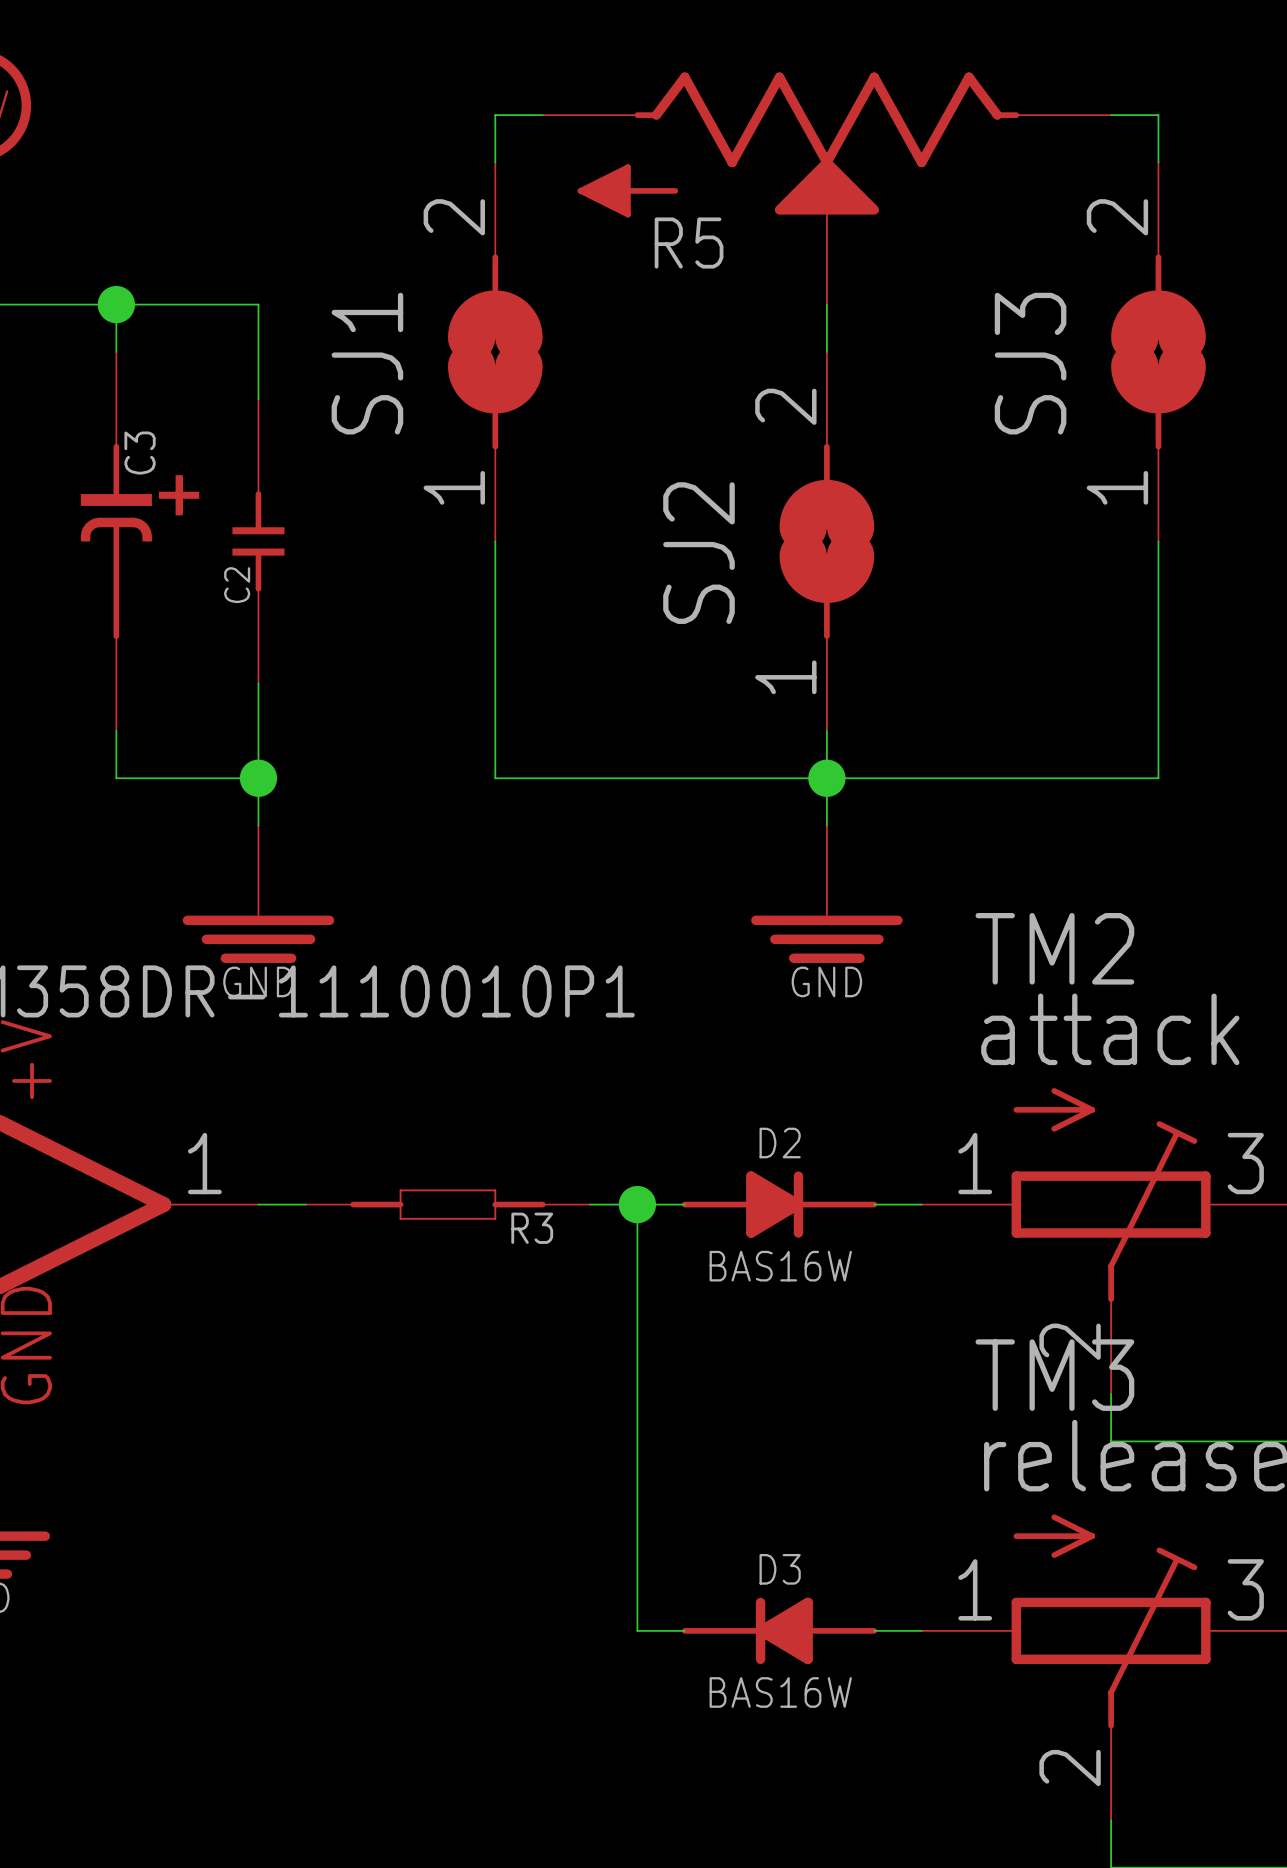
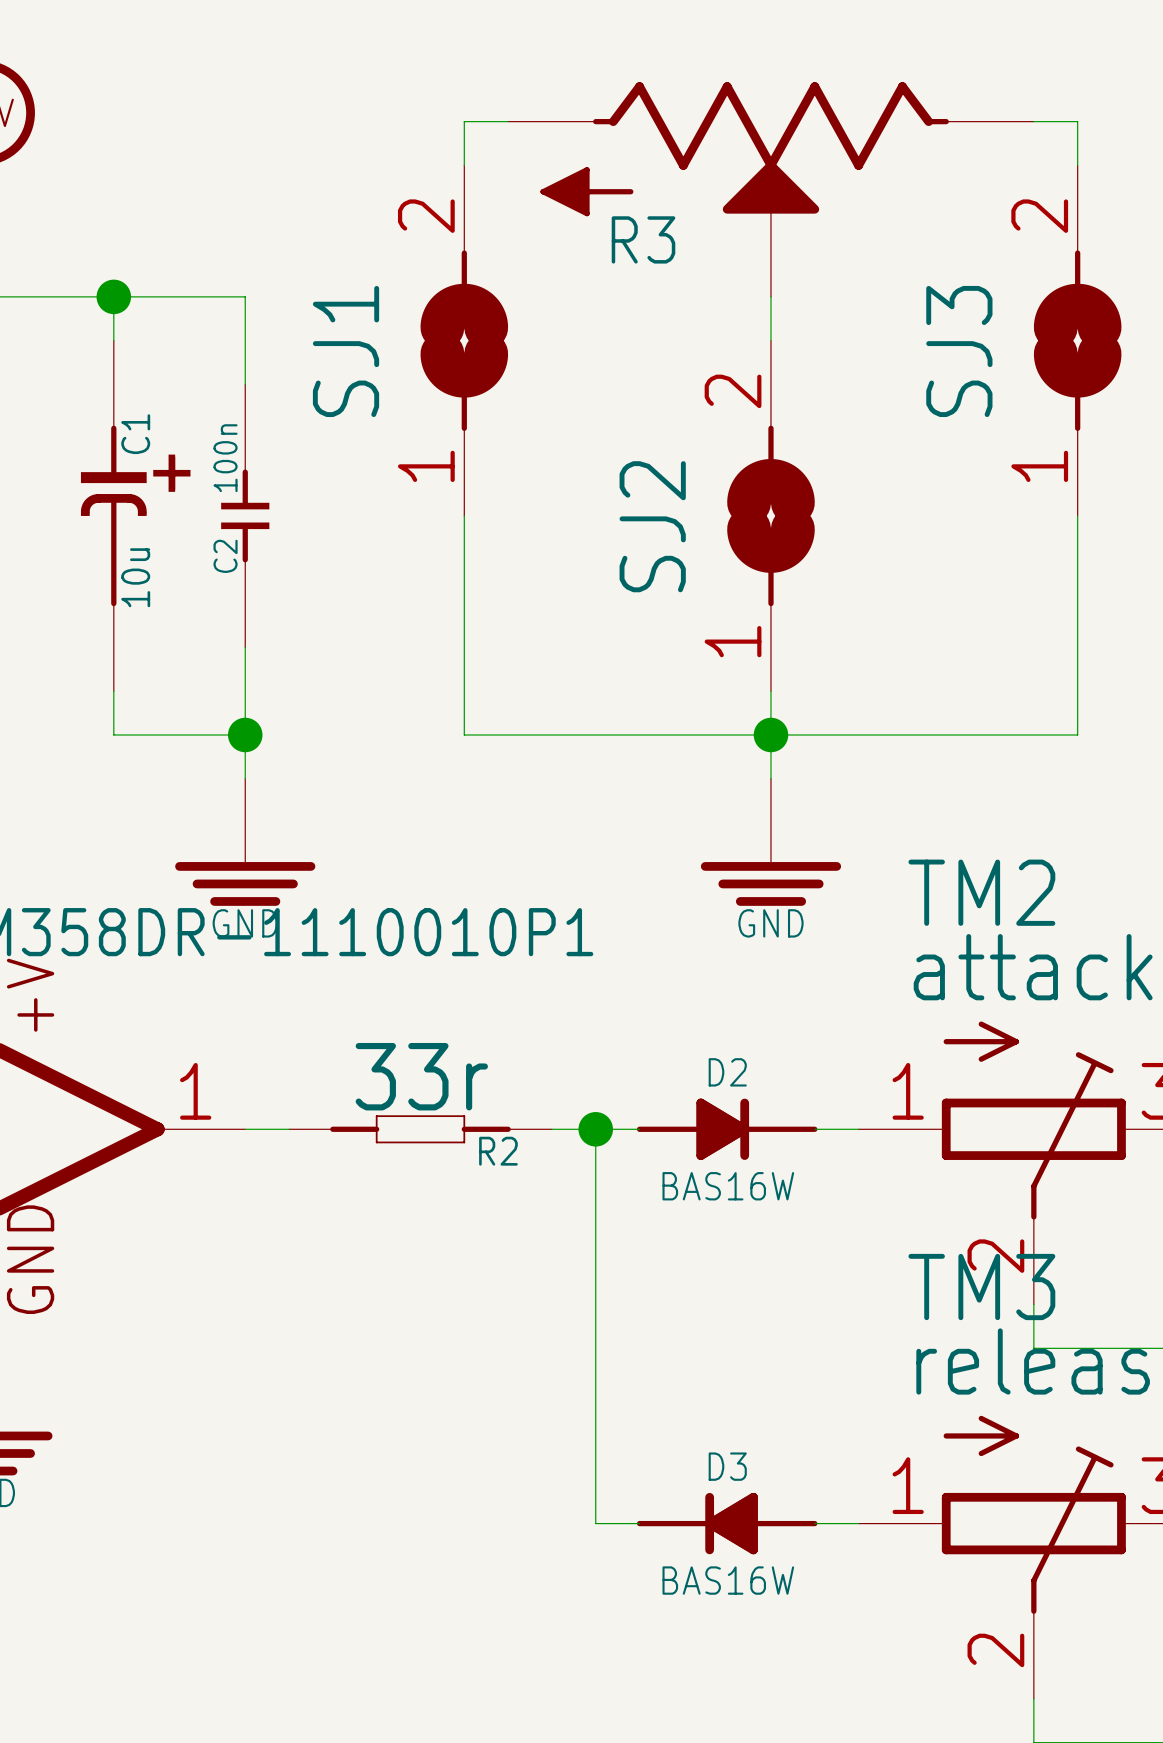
R5 name: R5 (689, 243) -> R3 (643, 239)
C3 name: C3 (140, 453) -> C1 (135, 434)
C2 value: none -> 100n (225, 458)
C3 value: none -> 10u (135, 577)
R3 value: none -> 33r (421, 1076)
R3 name: R3 (532, 1228) -> R2 (498, 1151)

